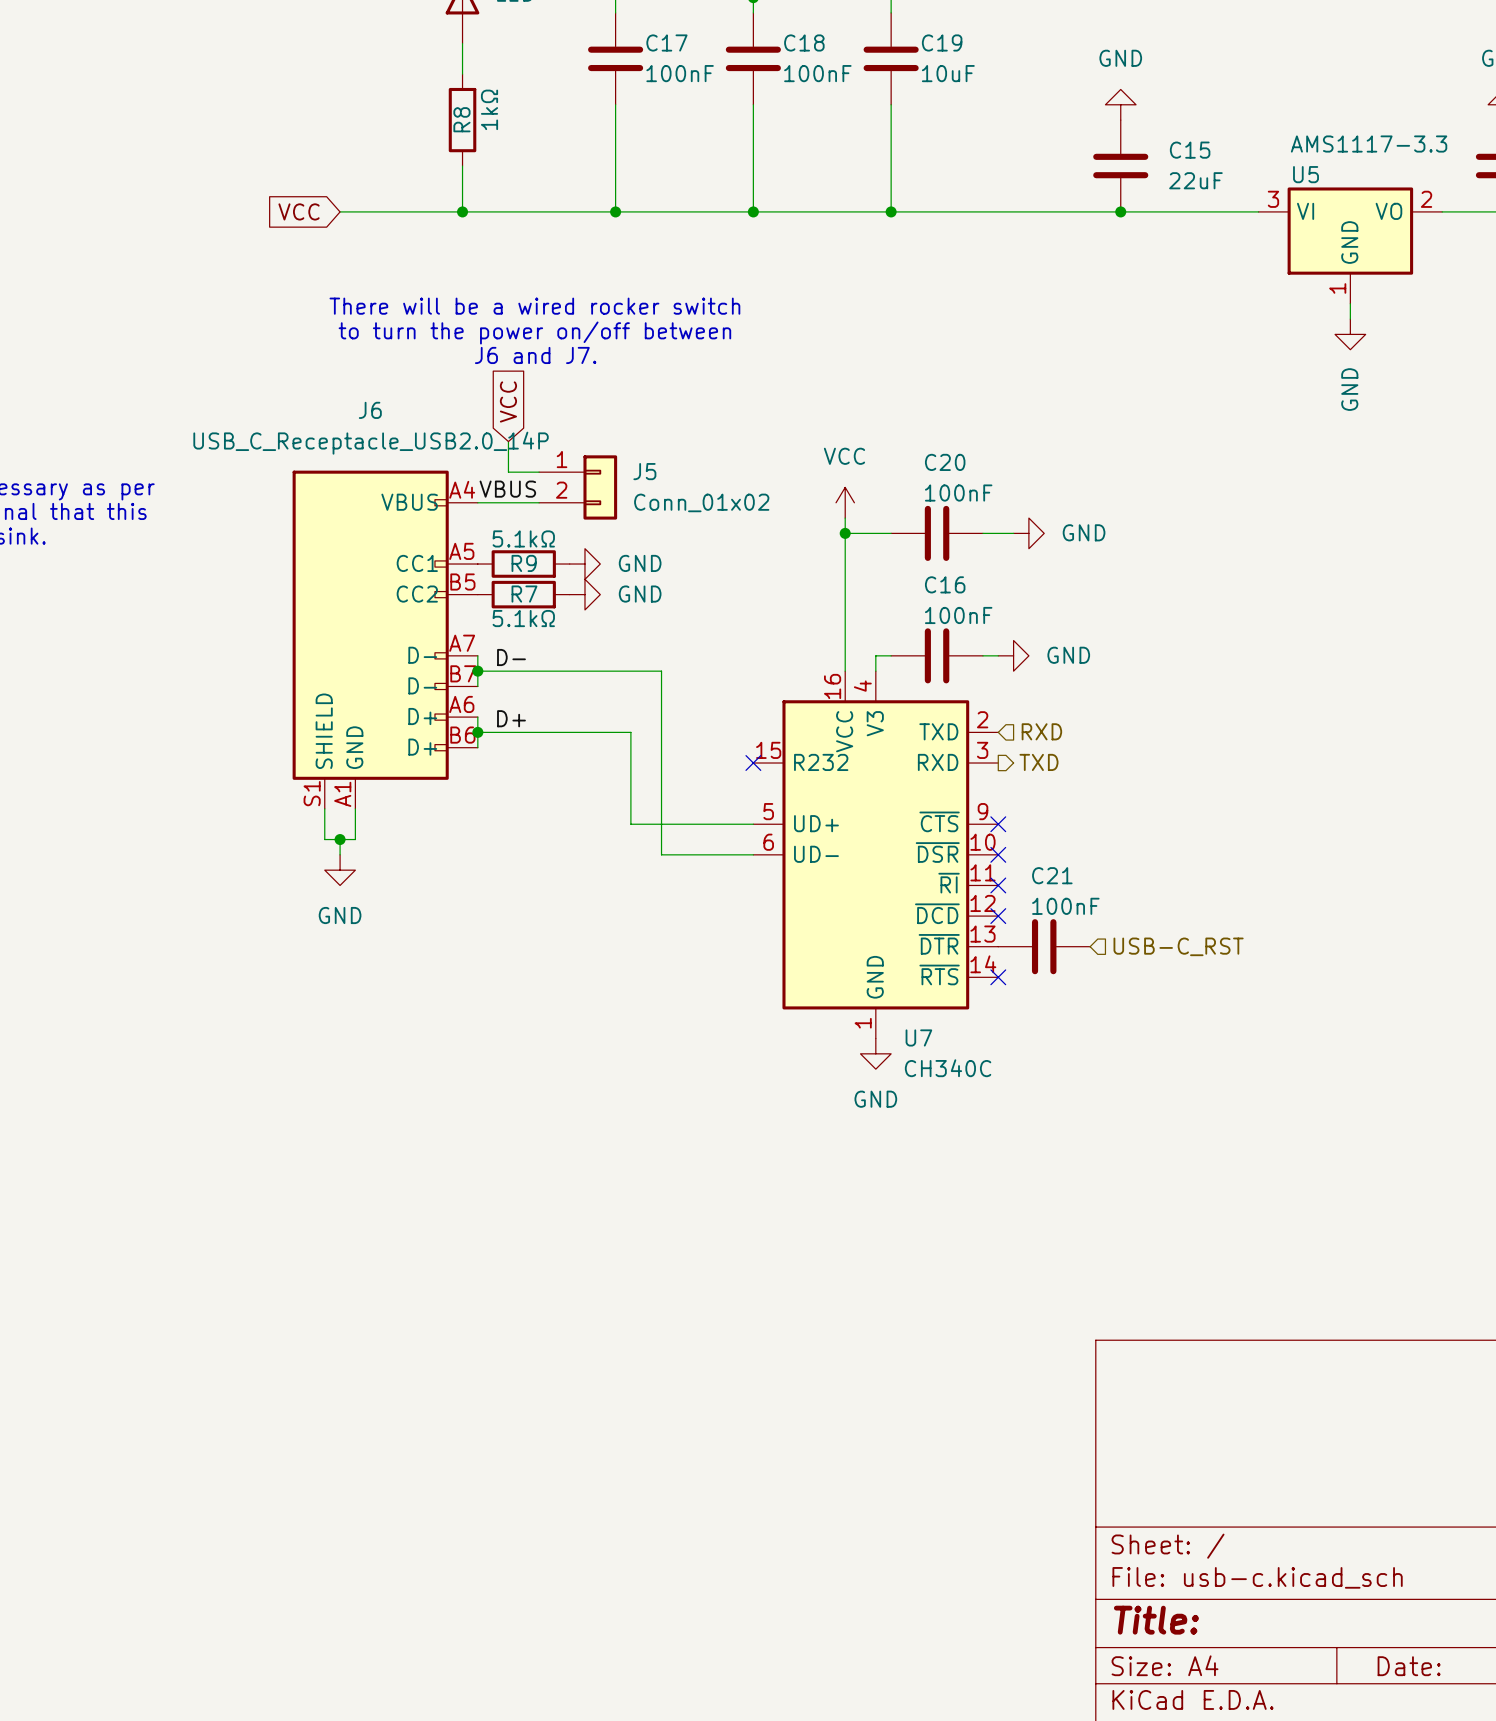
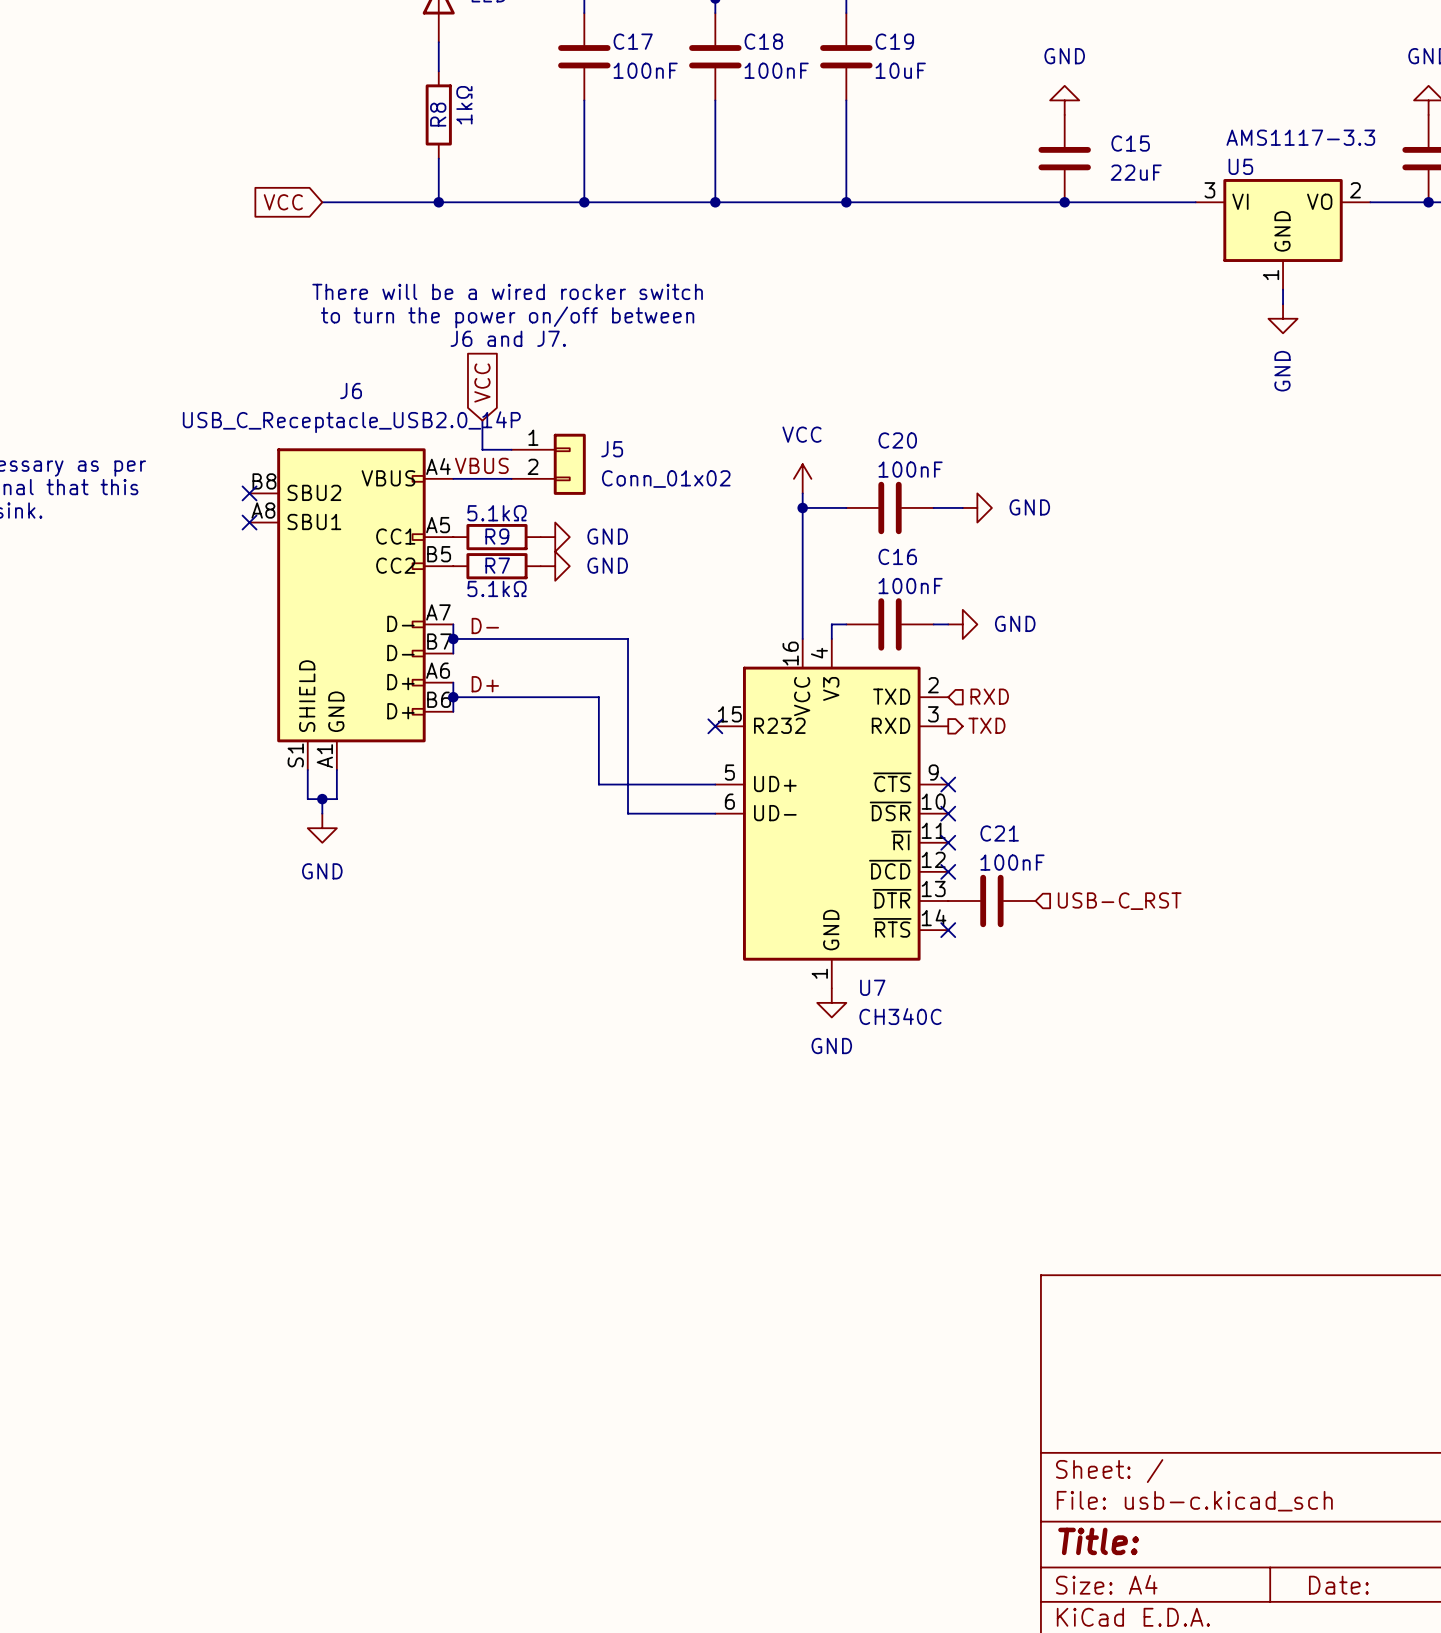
J6 symbol: [292, 470, 478, 809] -> [249, 448, 454, 770]
no-connect mark: none -> (249, 493)
no-connect mark: none -> (249, 522)

